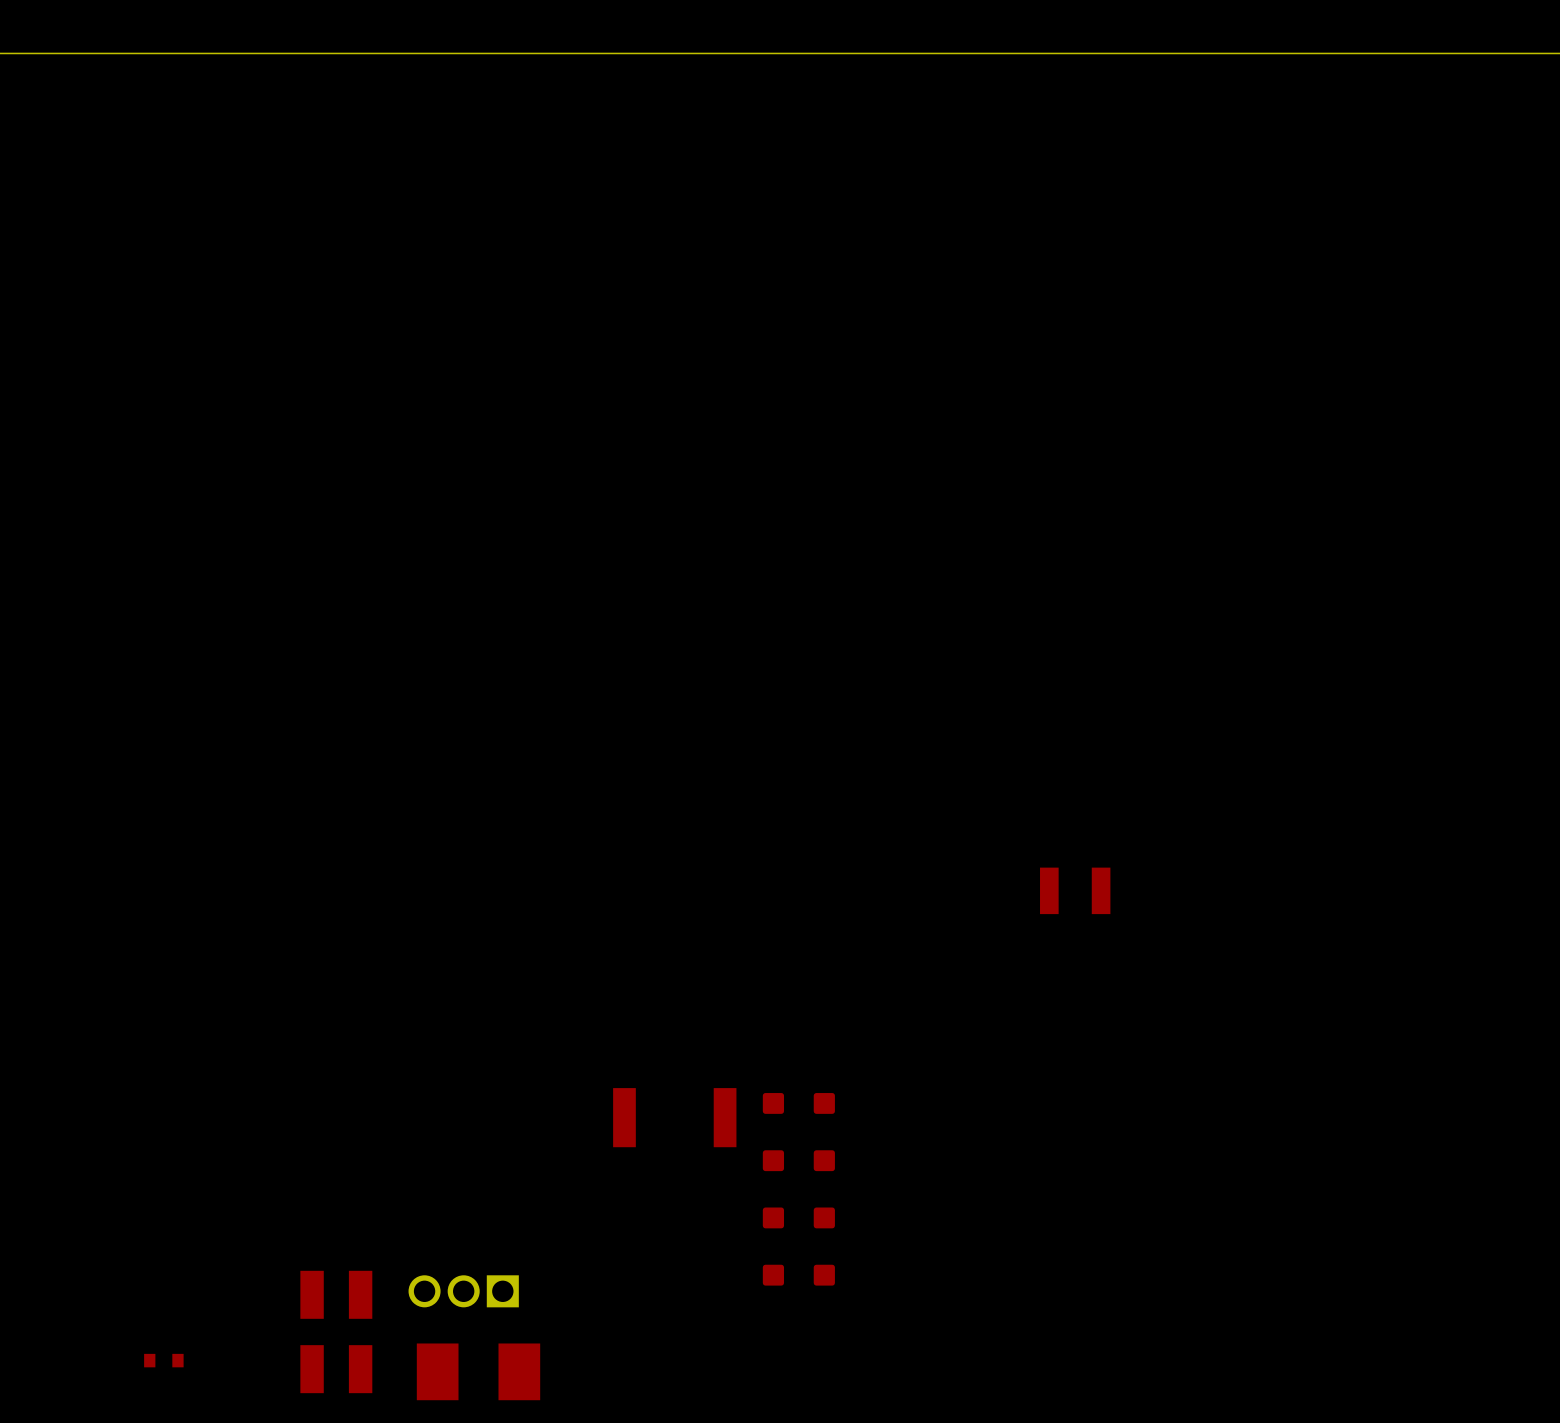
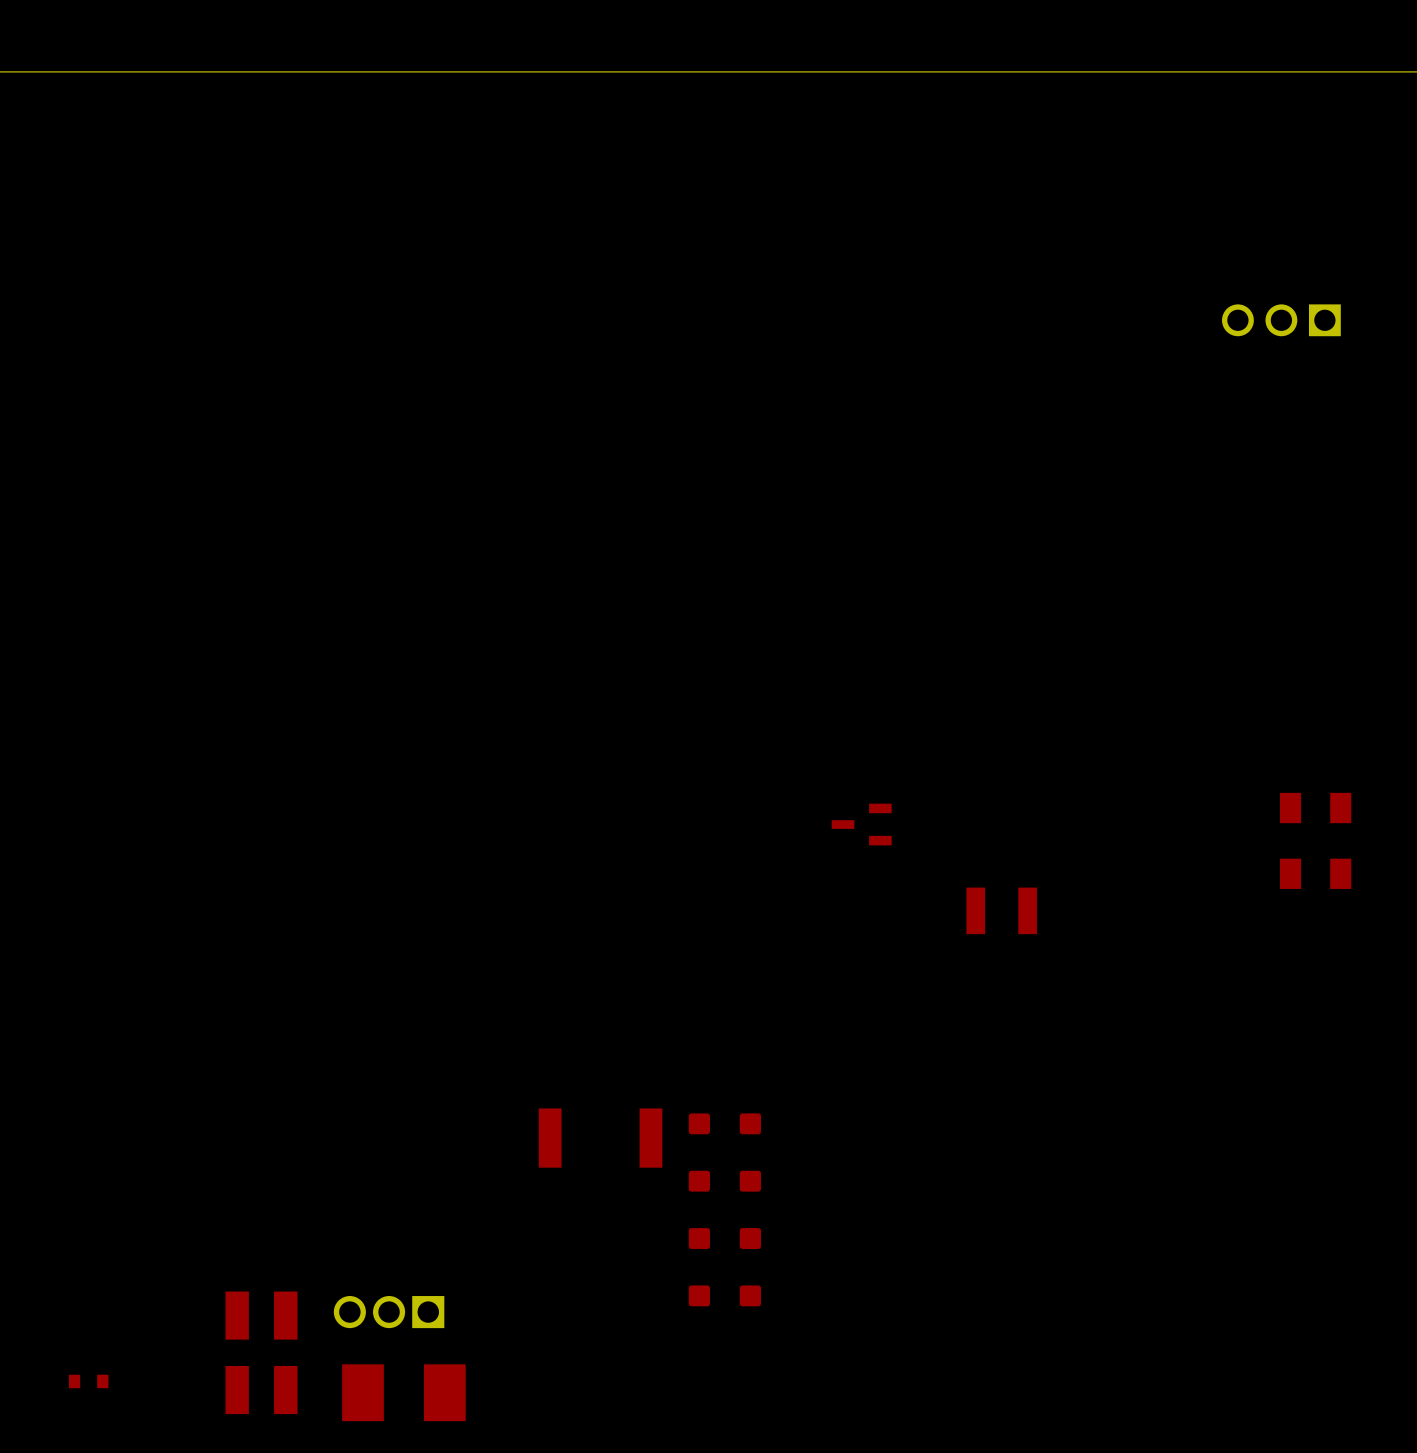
part: none -> (1281, 320)
part: none -> (1315, 808)
part: none -> (861, 824)
part: none -> (1315, 873)

